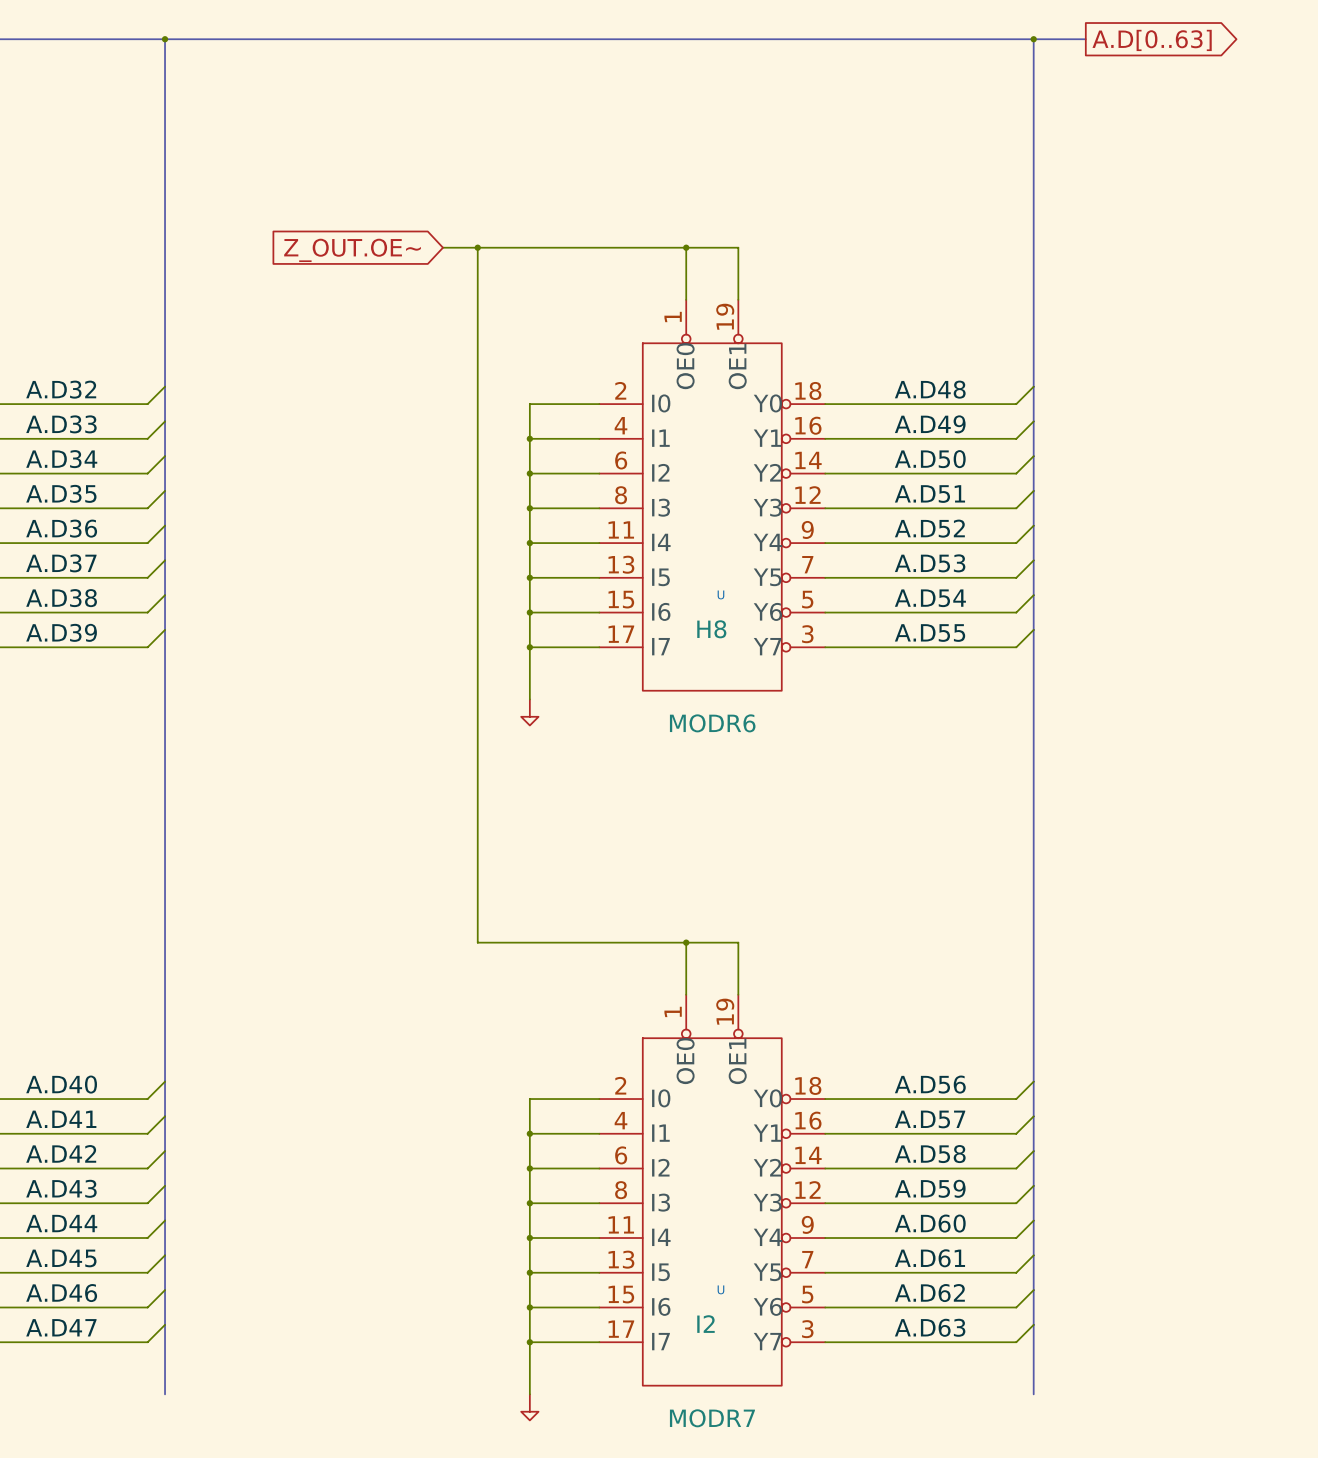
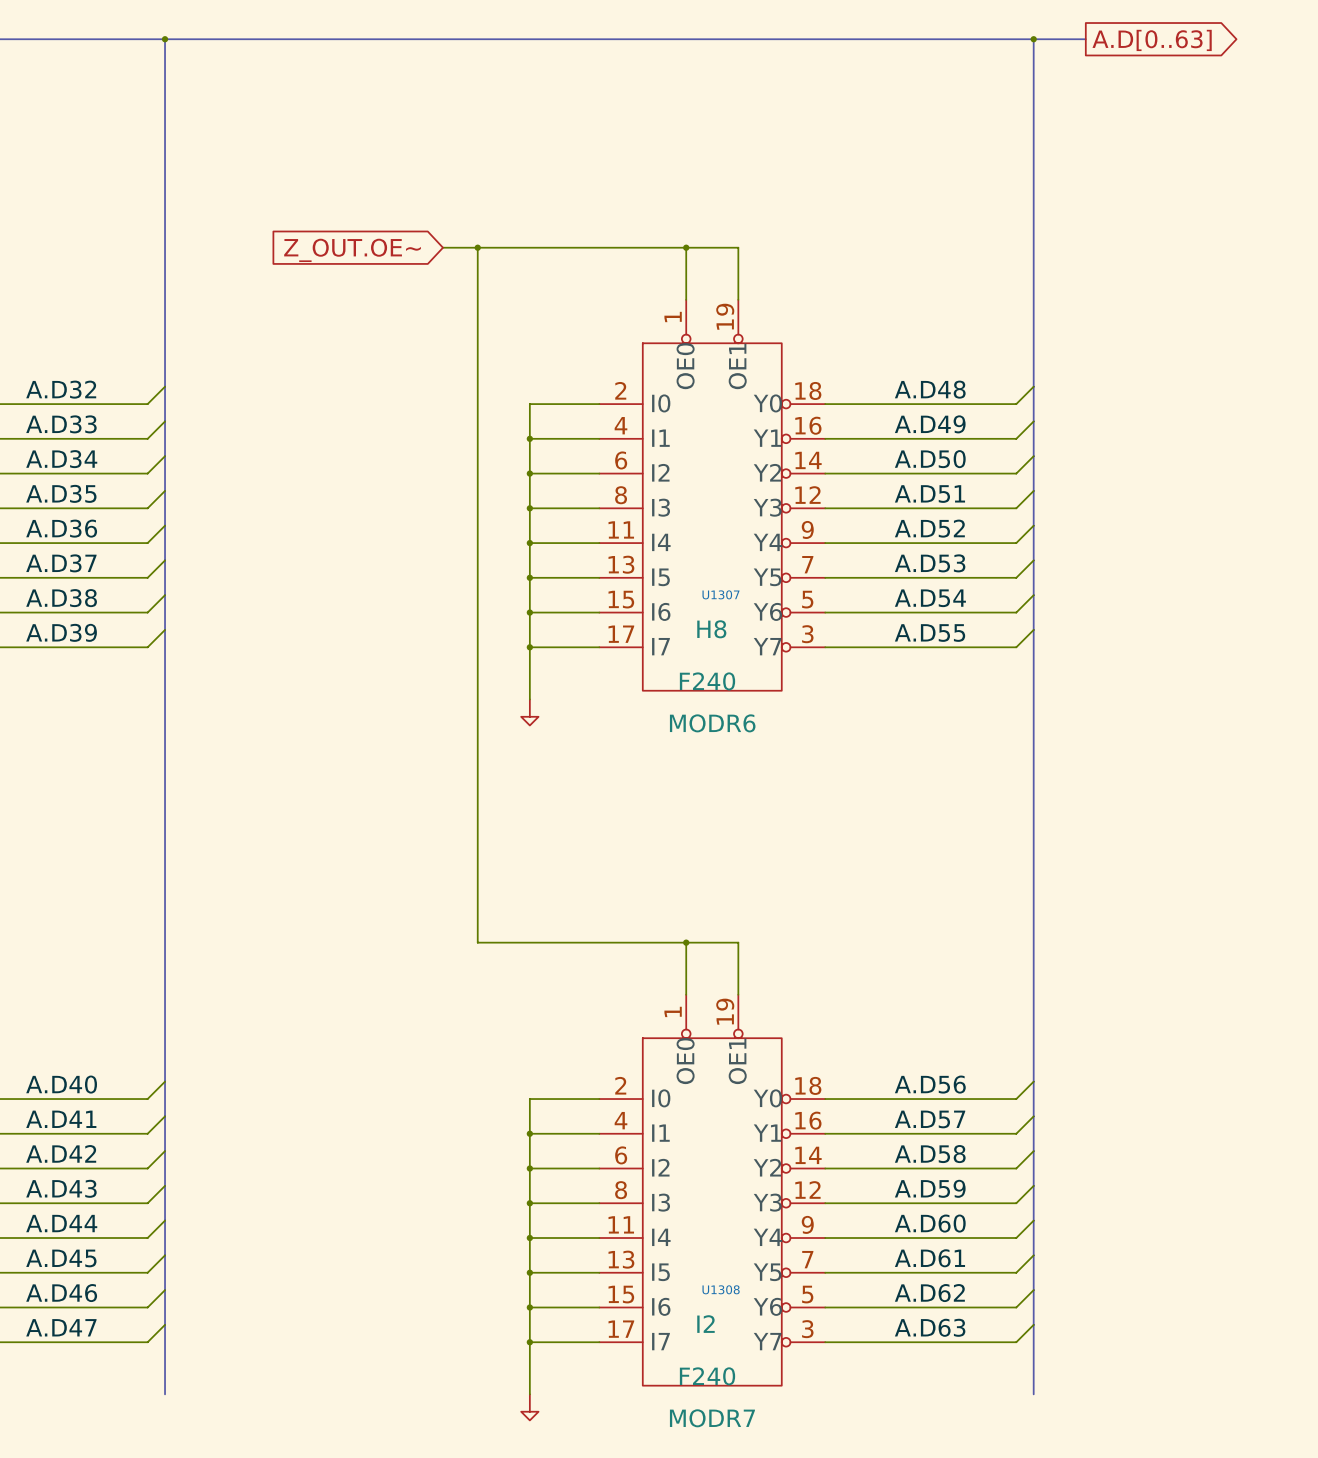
U name: U (720, 594) -> U1307 (720, 594)
U value: none -> F240 (707, 681)
U name: U (720, 1289) -> U1308 (721, 1289)
U value: none -> F240 (707, 1376)

